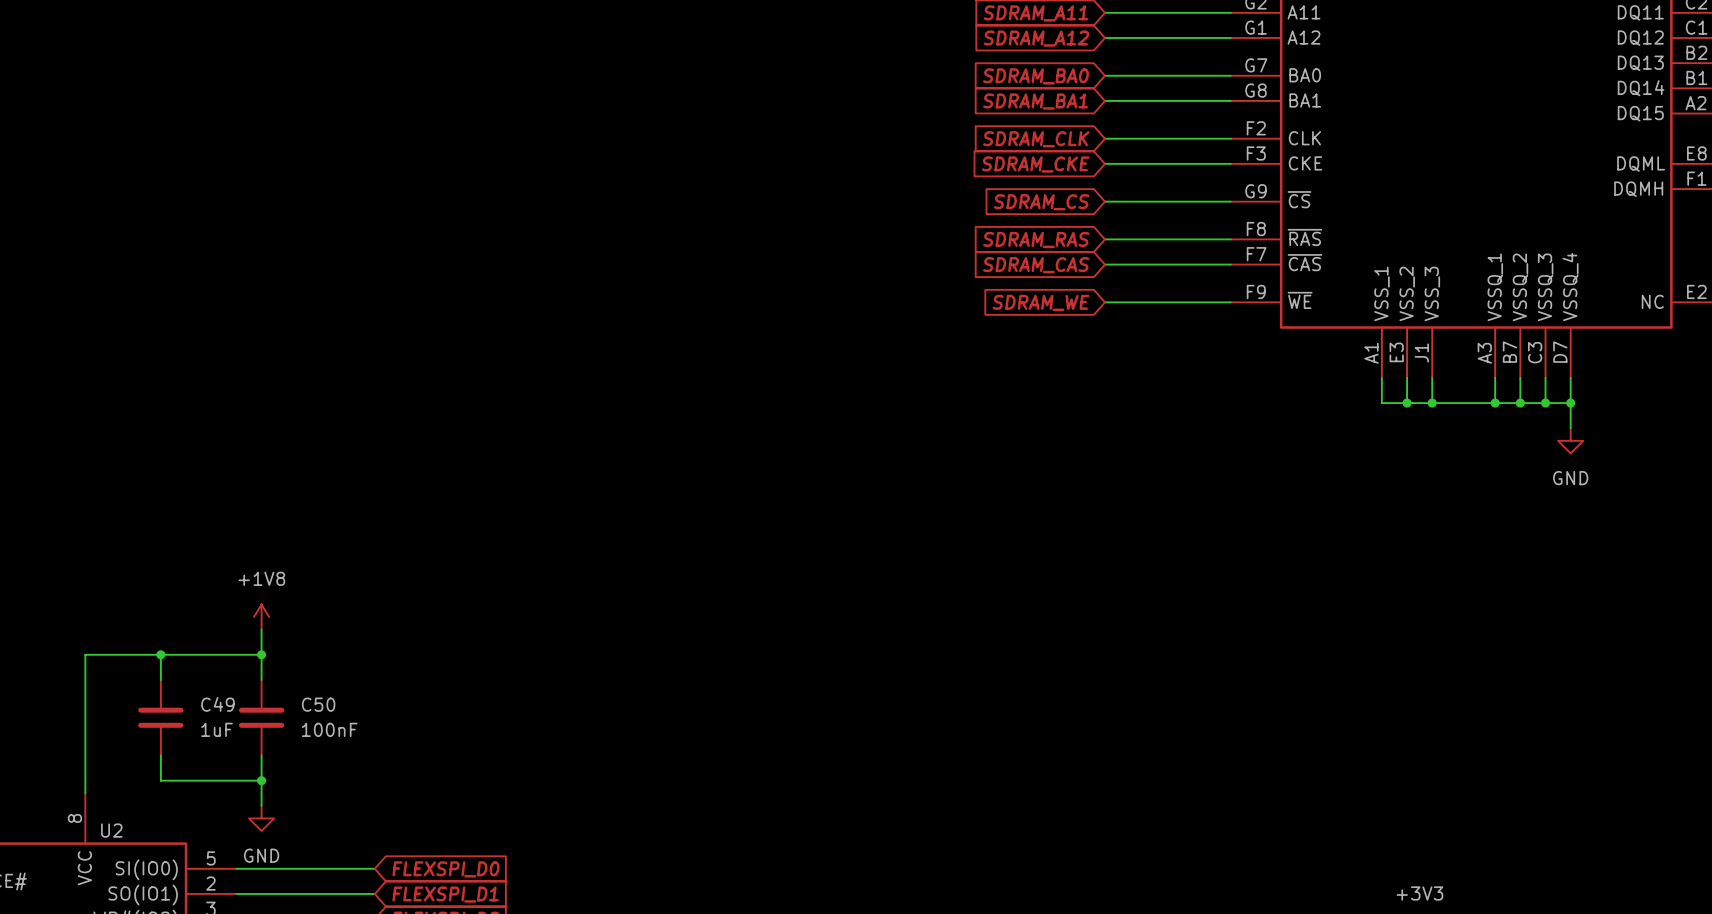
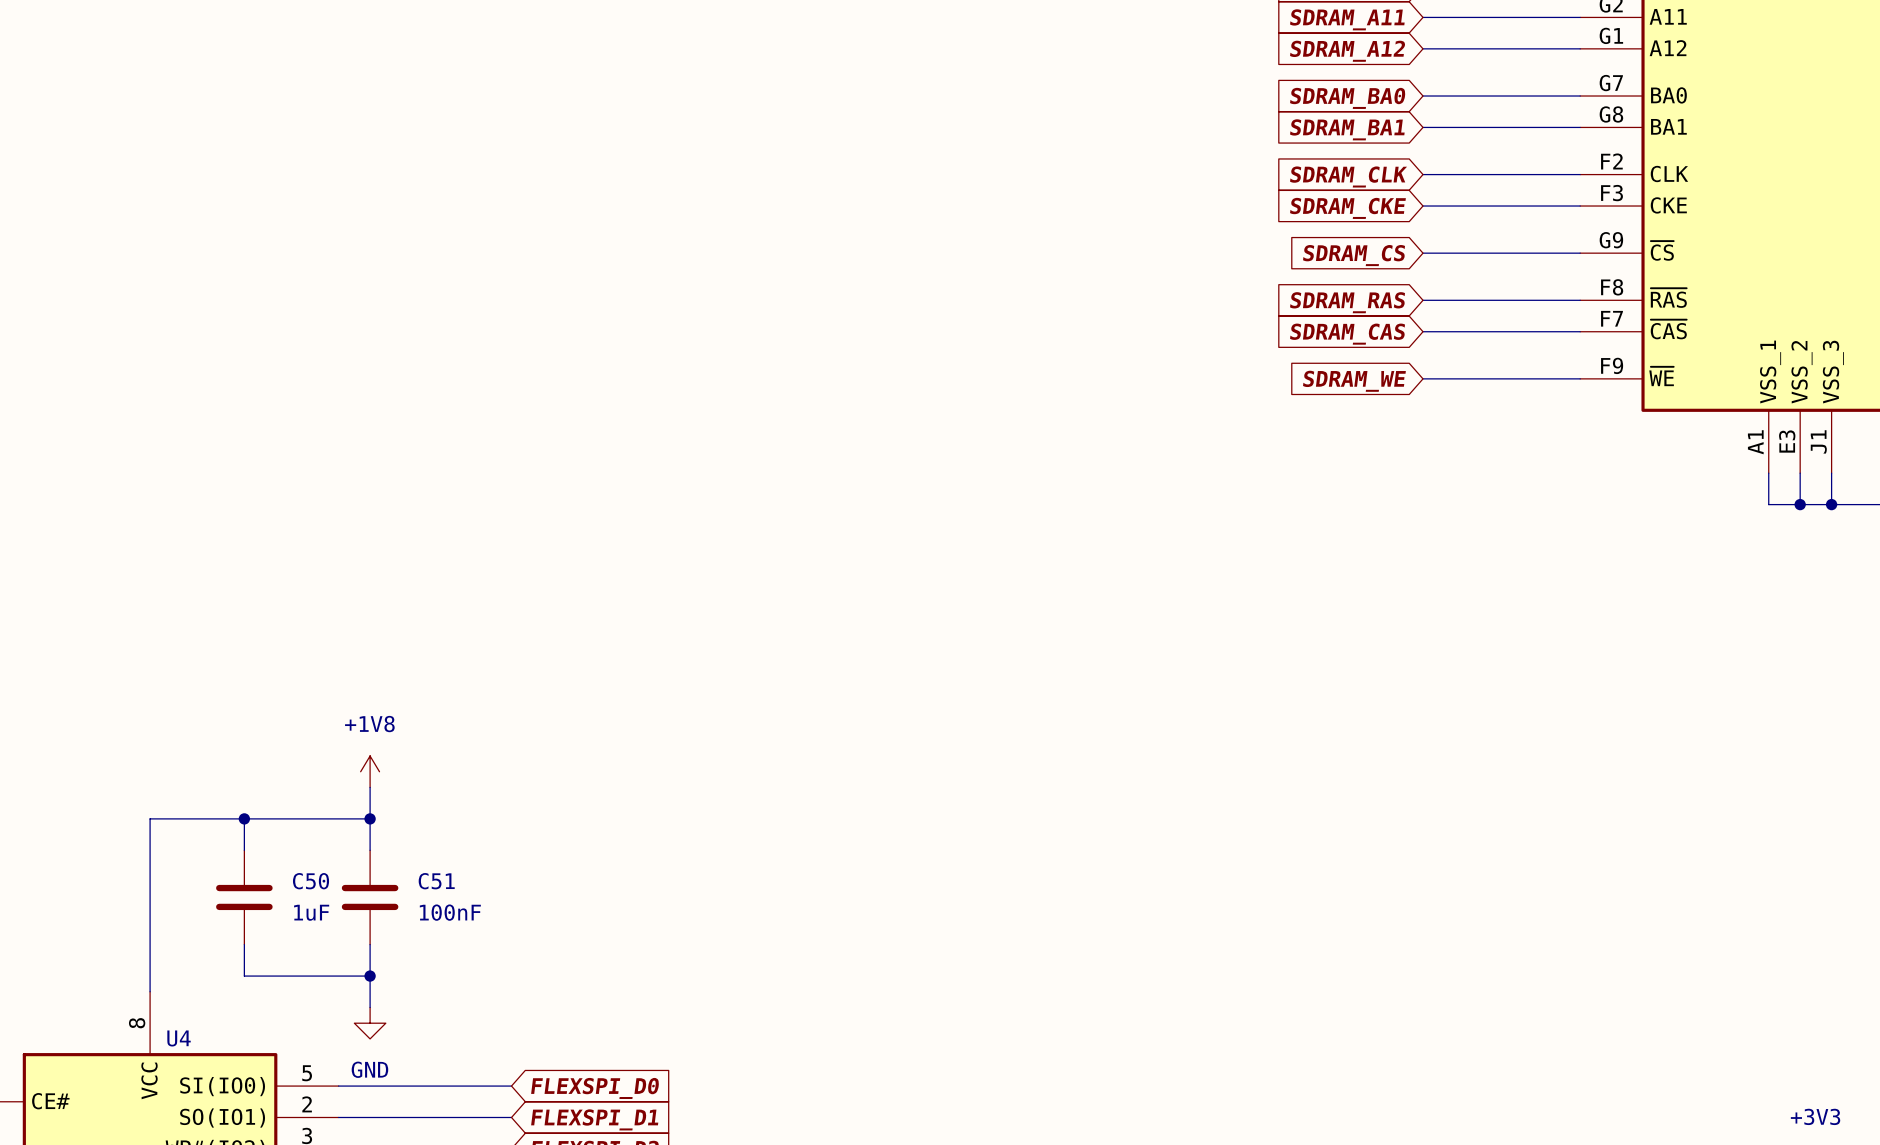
C49 name: C49 (217, 704) -> C50 (311, 881)
C50 name: C50 (318, 704) -> C51 (436, 881)
U2 name: U2 (111, 830) -> U4 (179, 1038)

